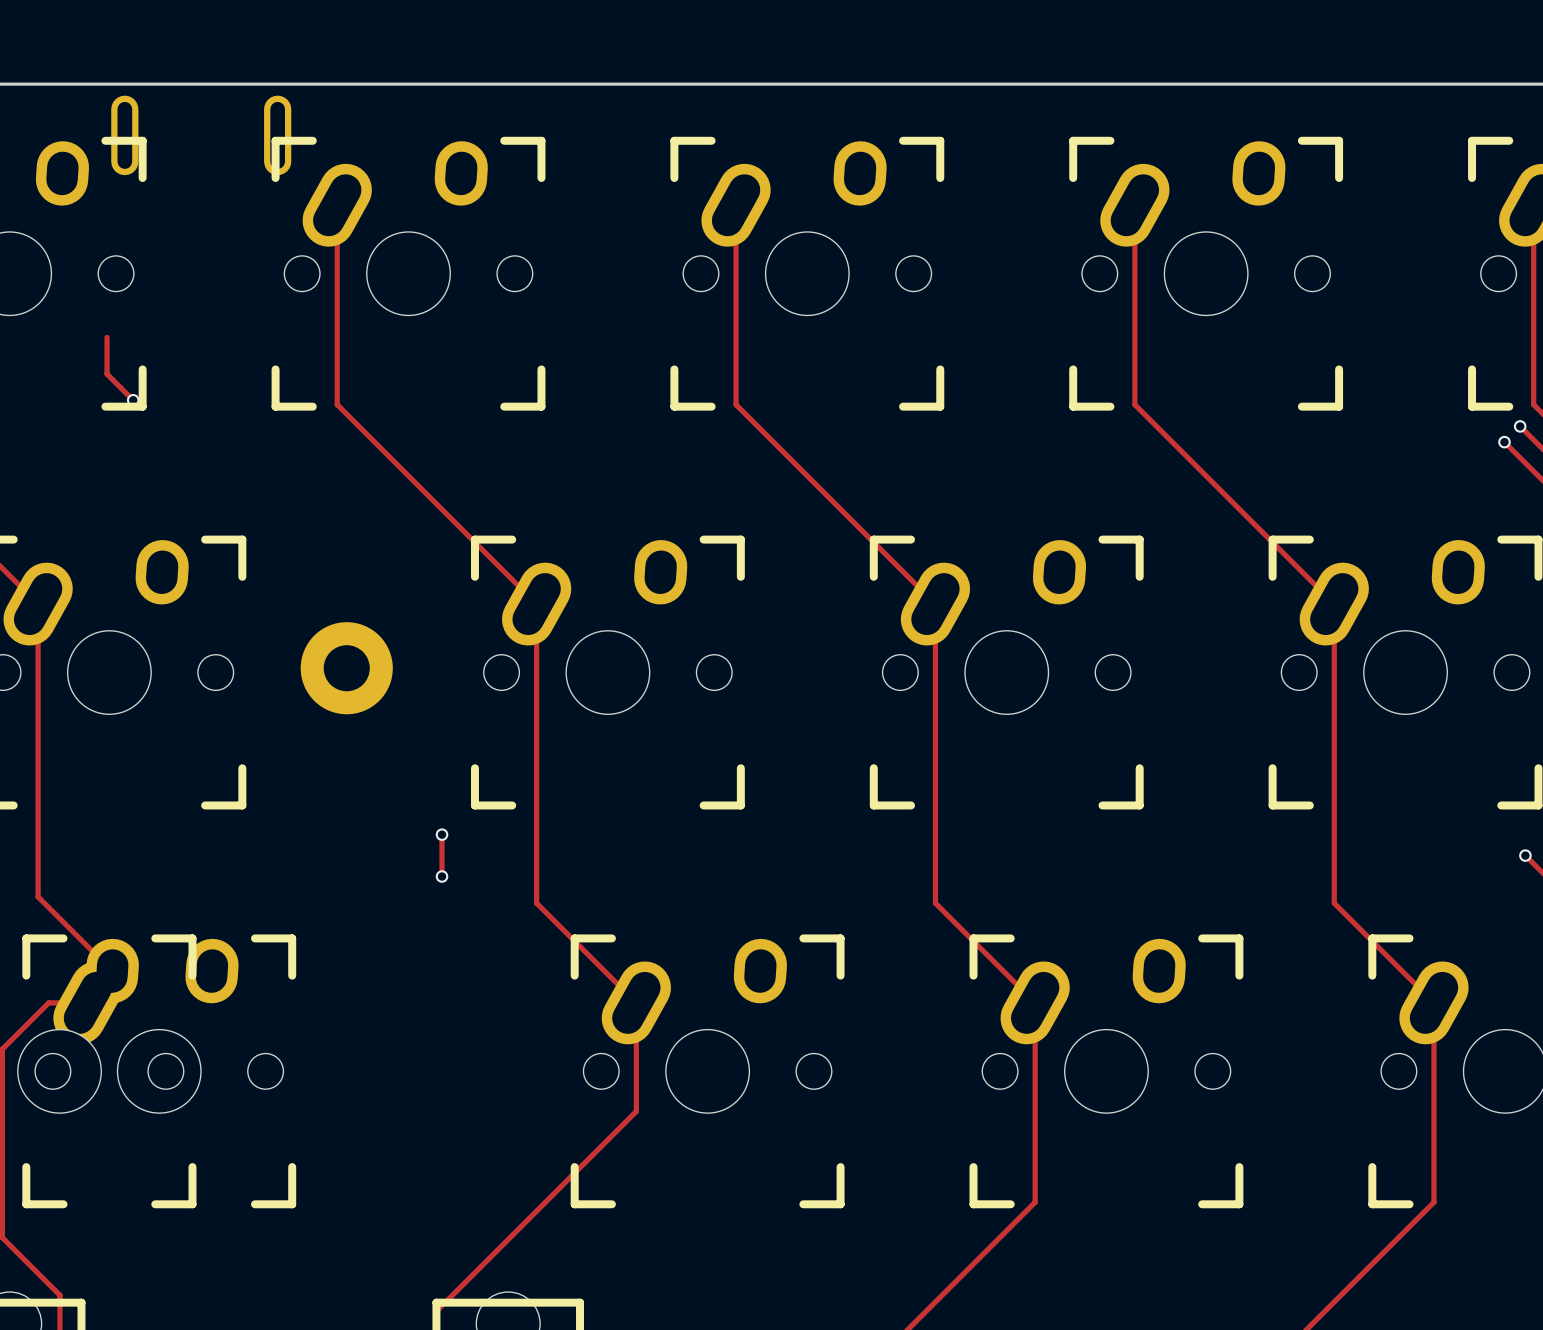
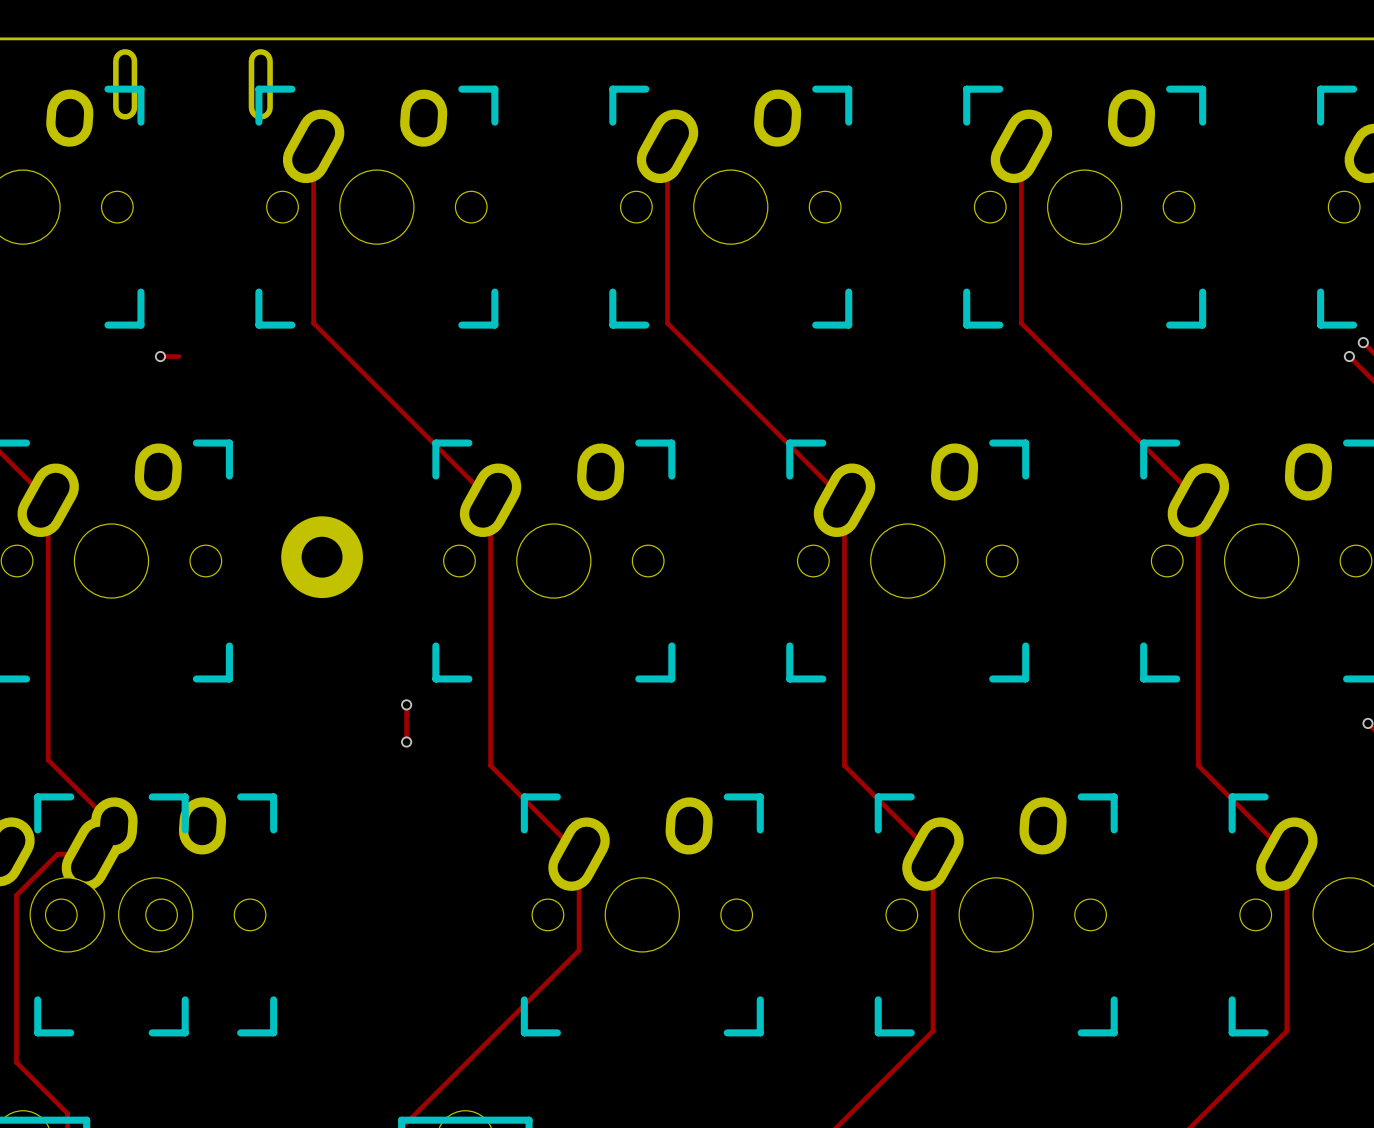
track: (107, 337) (107, 374) (133, 400) -> none
via position: (133, 400) -> (160, 356)
track: none -> (160, 356) (179, 356)

